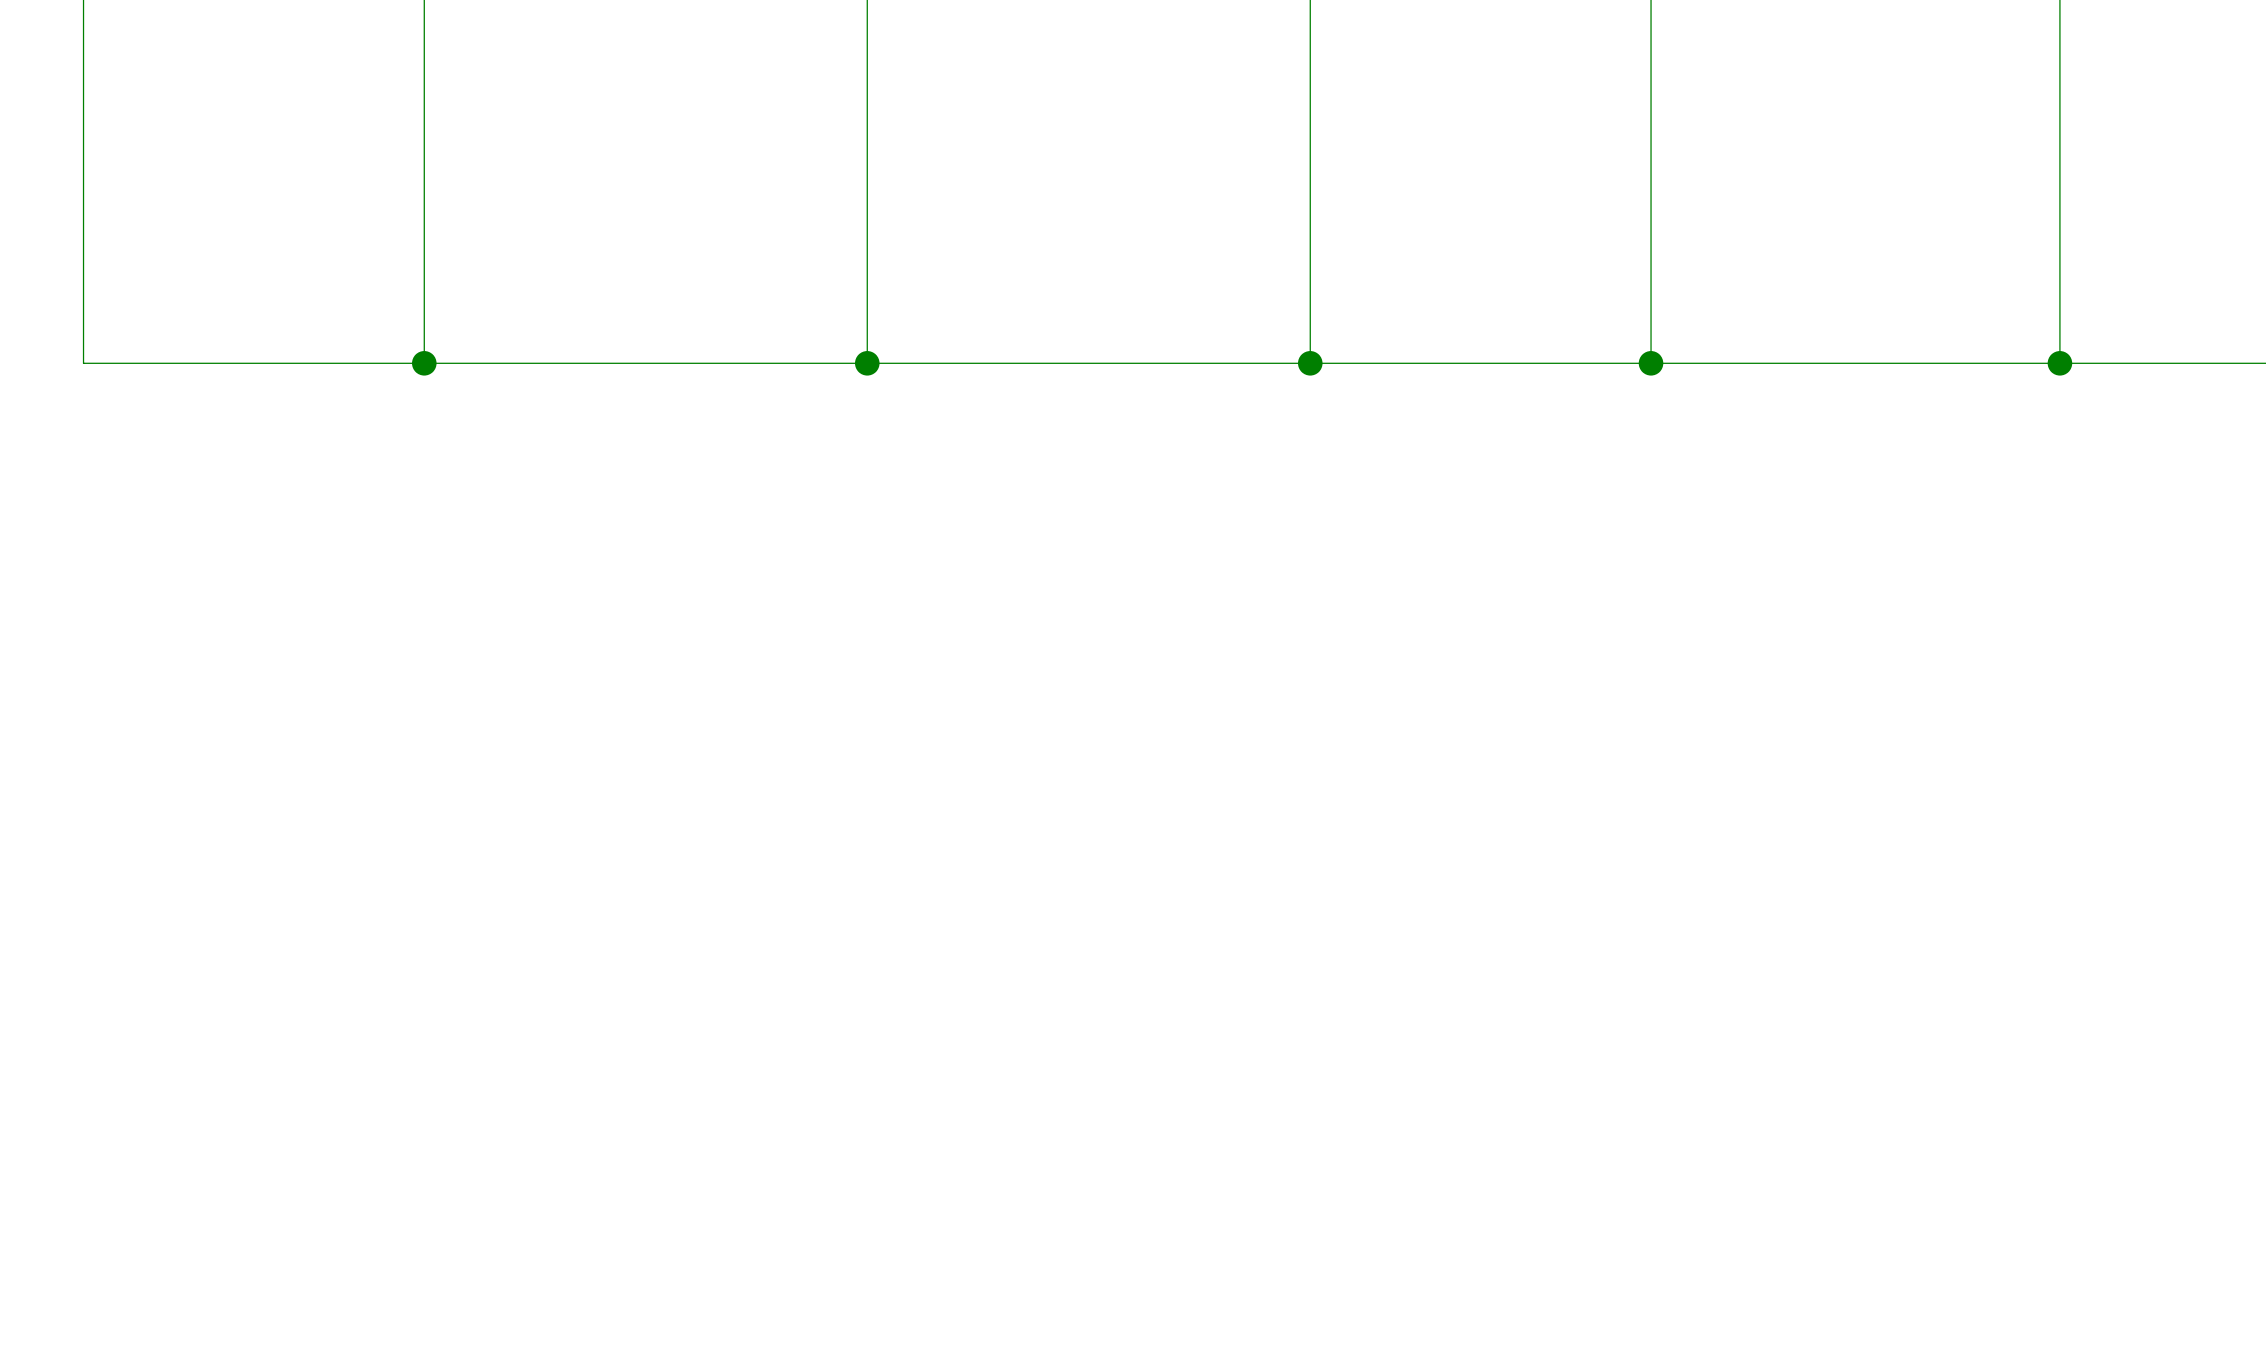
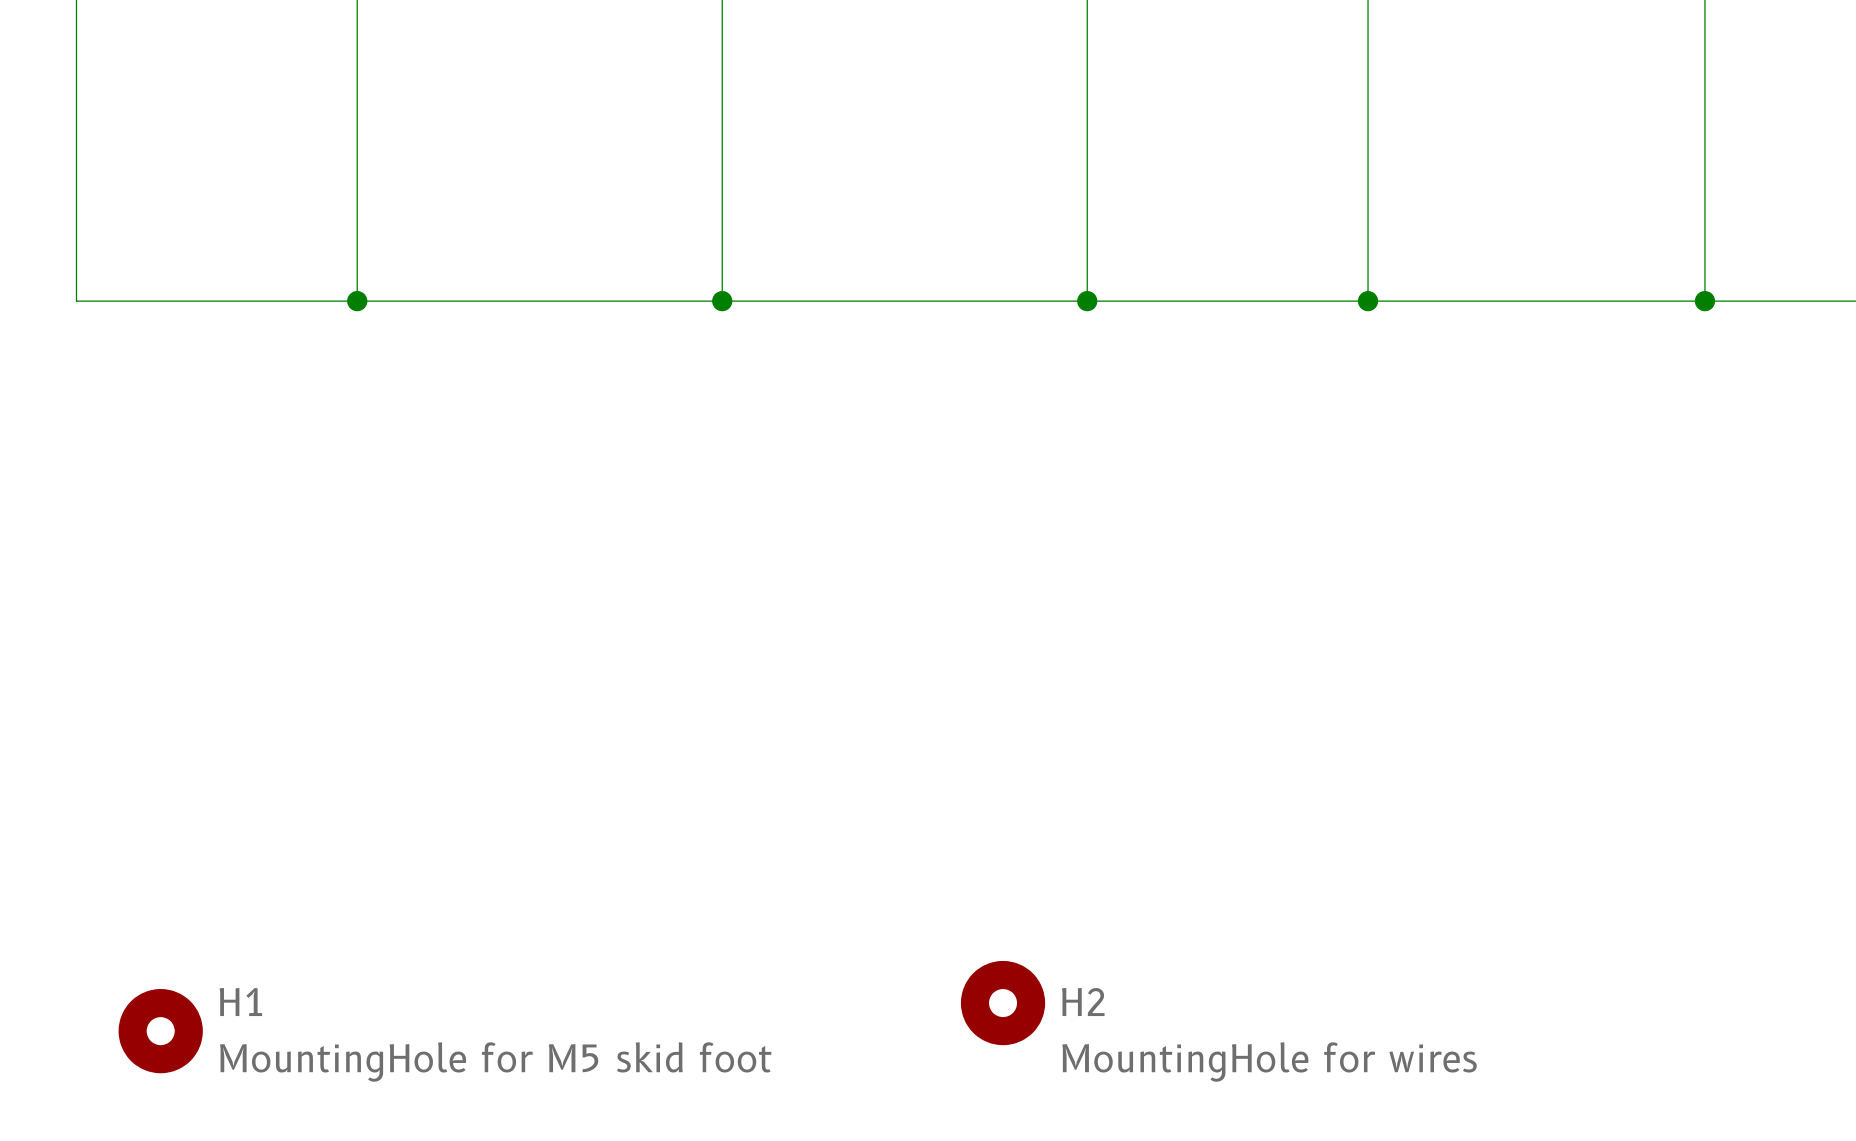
H2: none -> MountingHole for wires (1003, 1003)
H1: none -> MountingHole for M5 skid foot (160, 1031)

